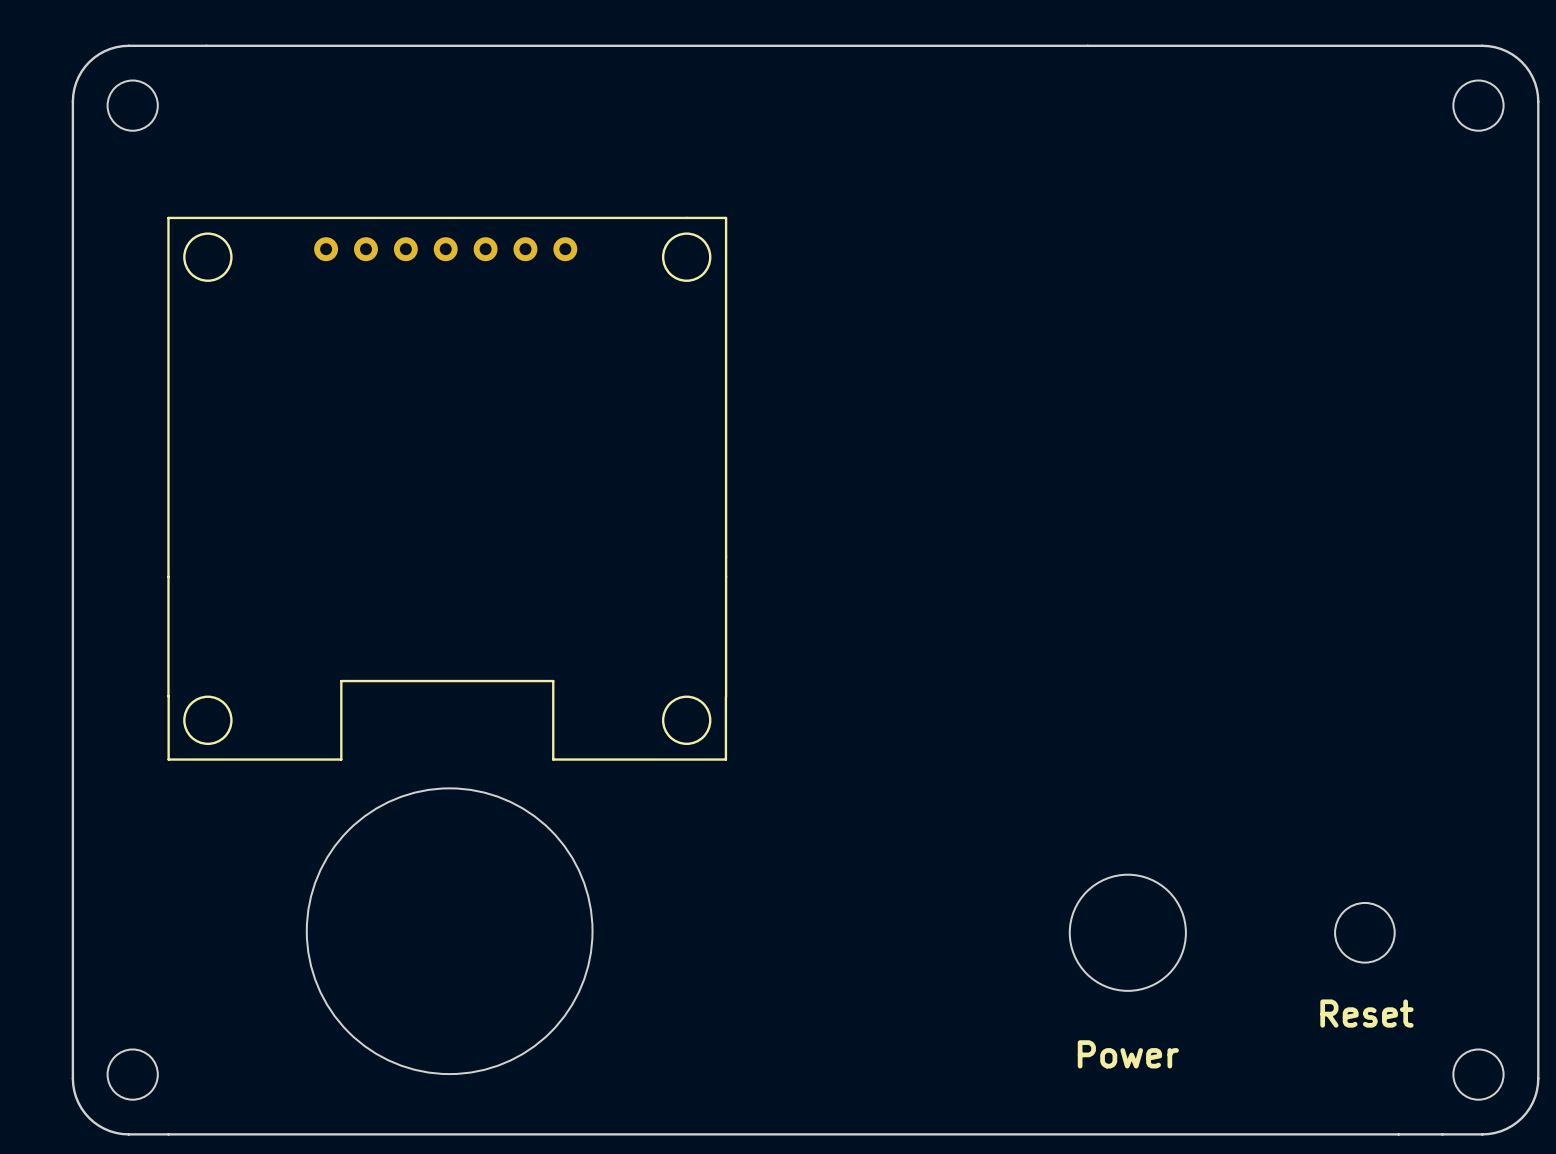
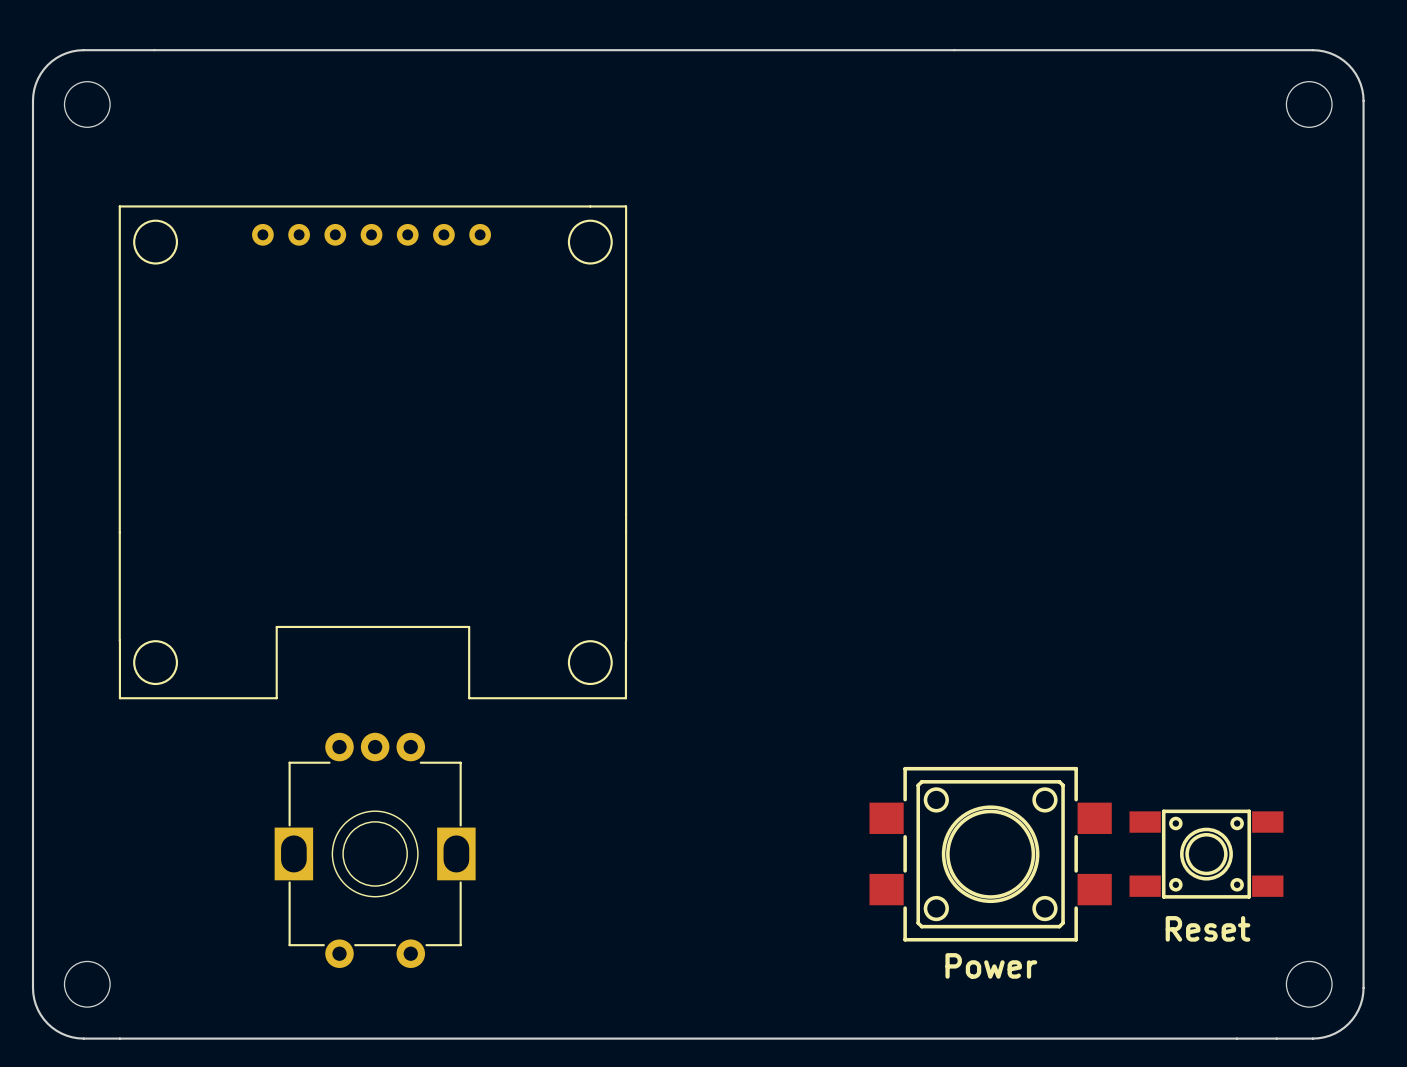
round board edge: [306, 787, 593, 1075] -> none
round board edge: [1069, 874, 1187, 992] -> none
round board edge: [1334, 902, 1396, 964] -> none
part: none -> (375, 850)
part: none -> (990, 854)
part: none -> (1206, 854)

